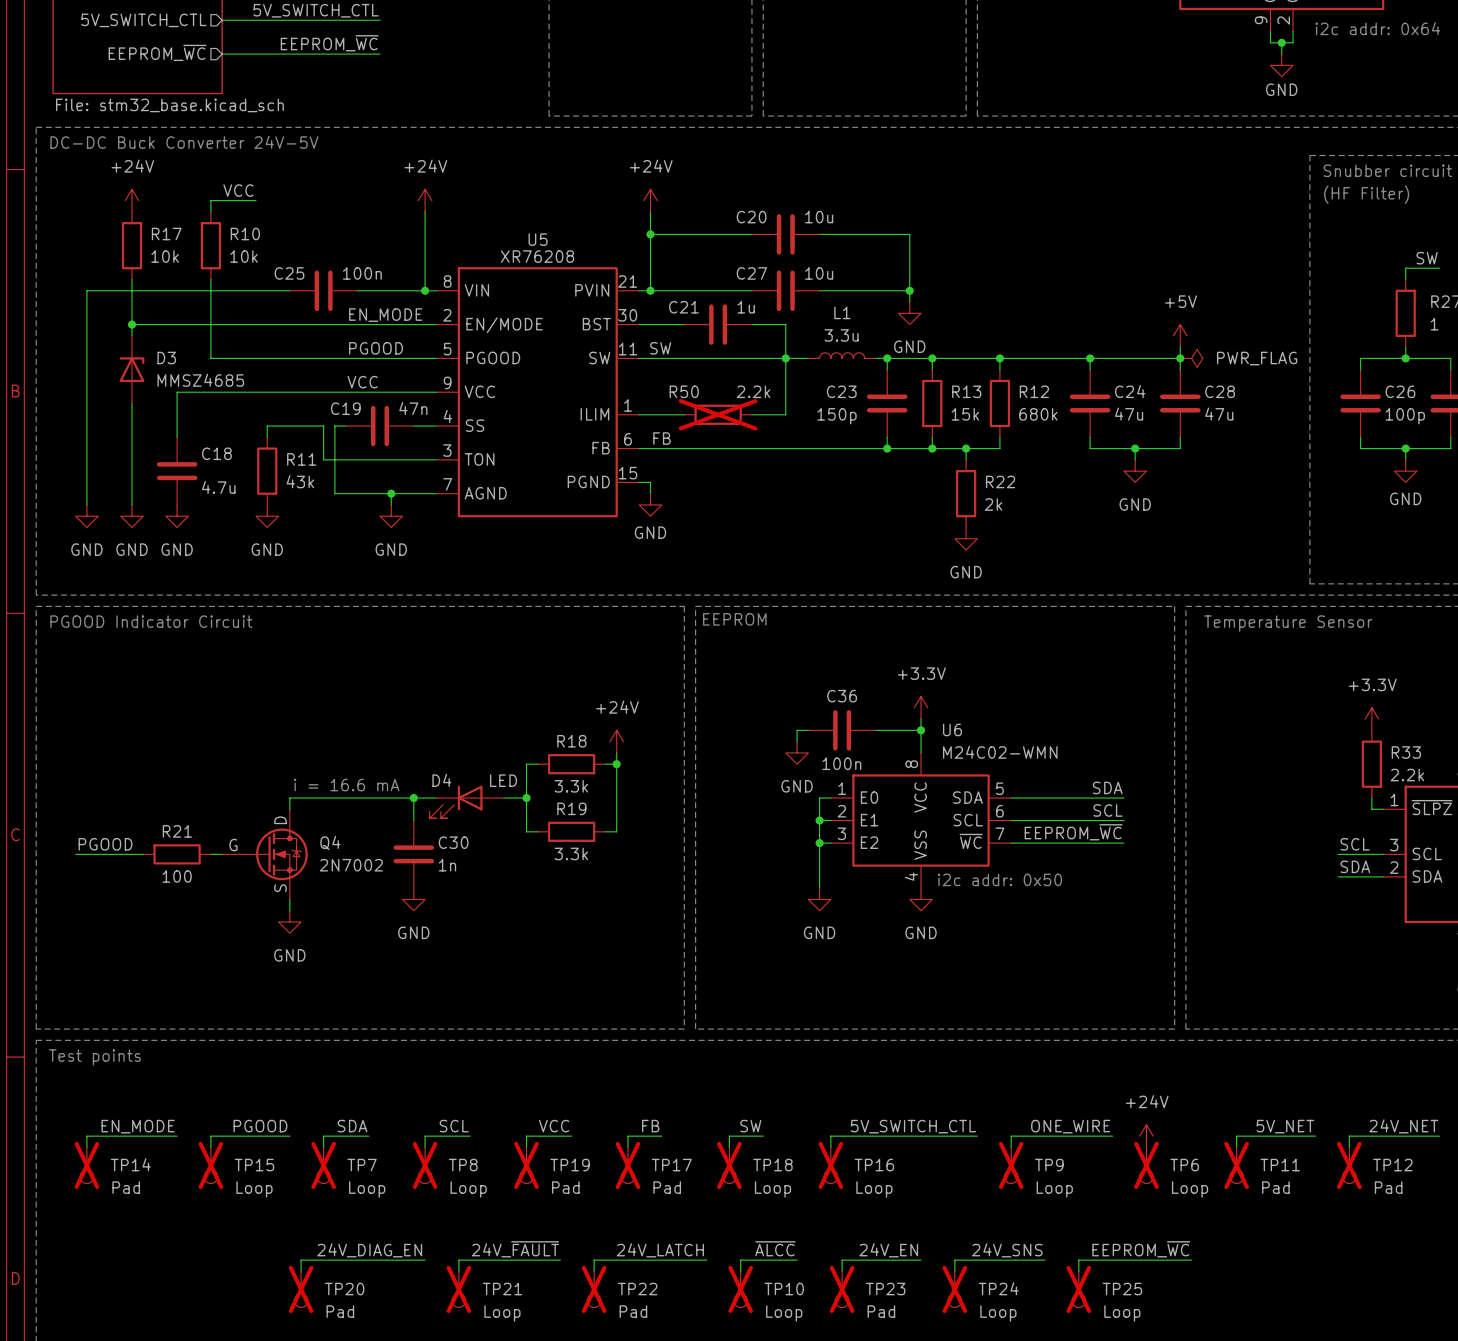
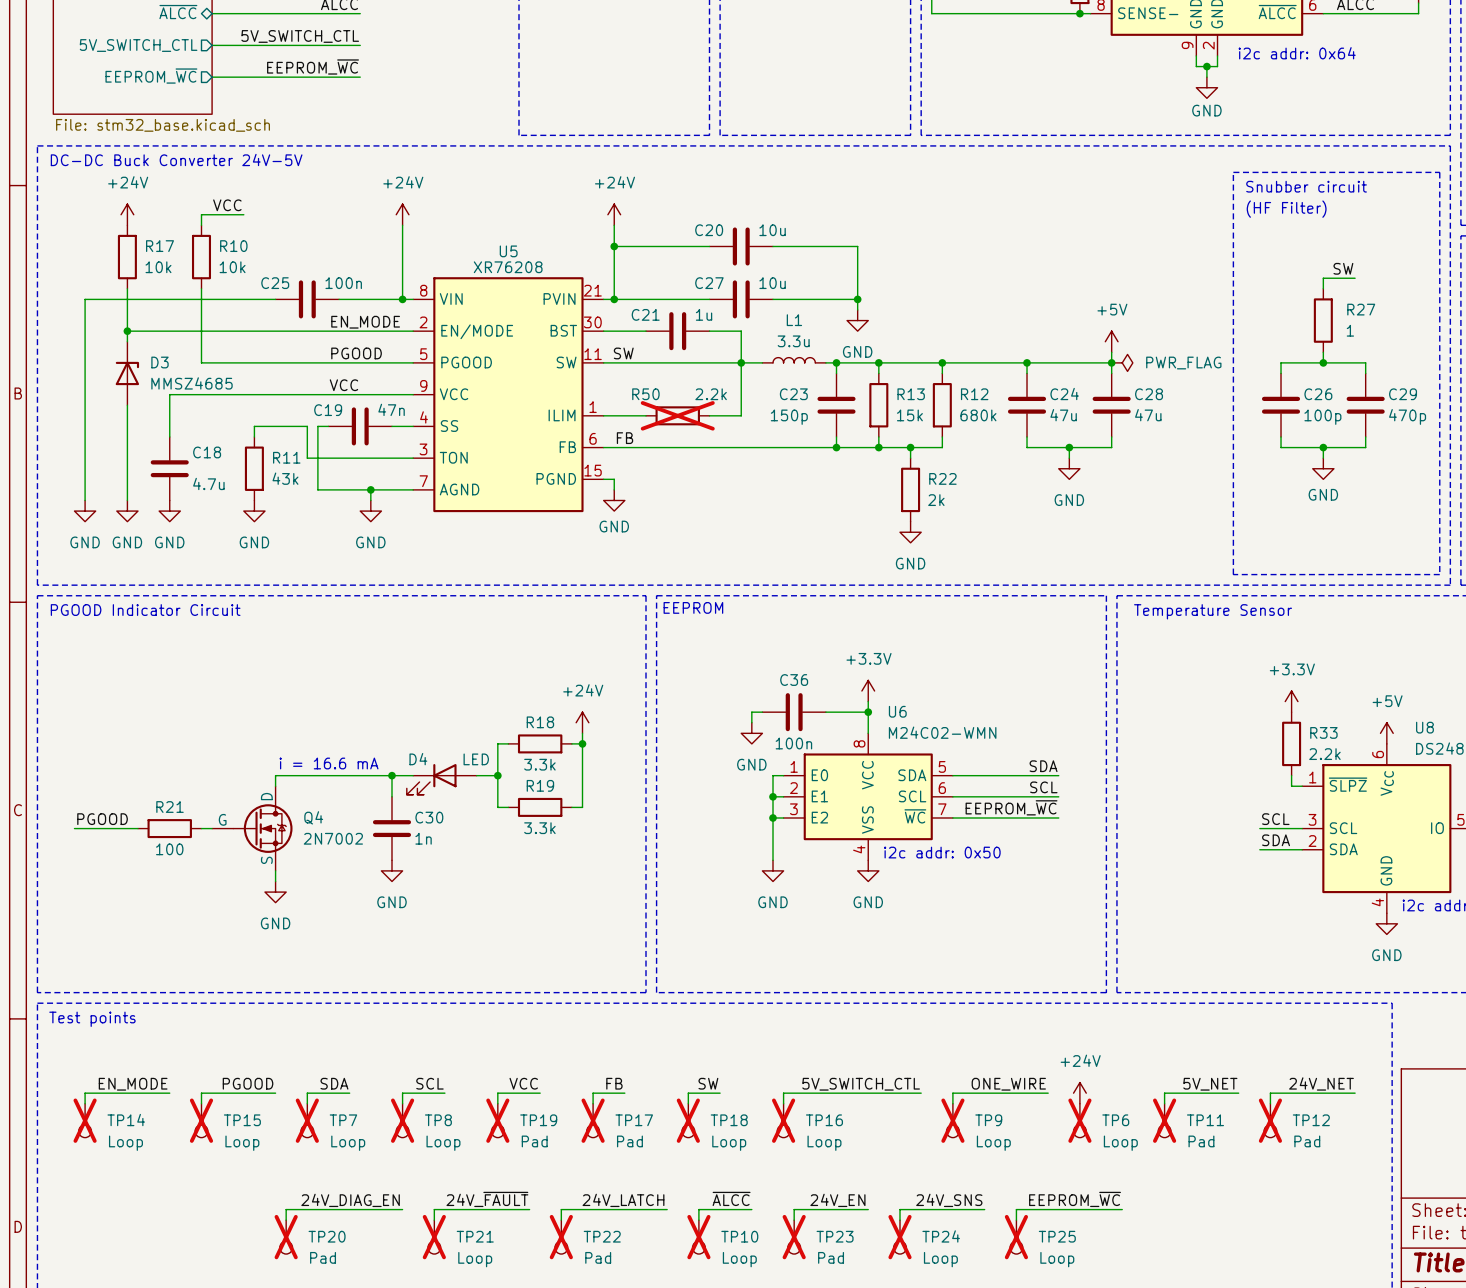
TP14 value: Pad (126, 1187) -> Loop (125, 1143)

